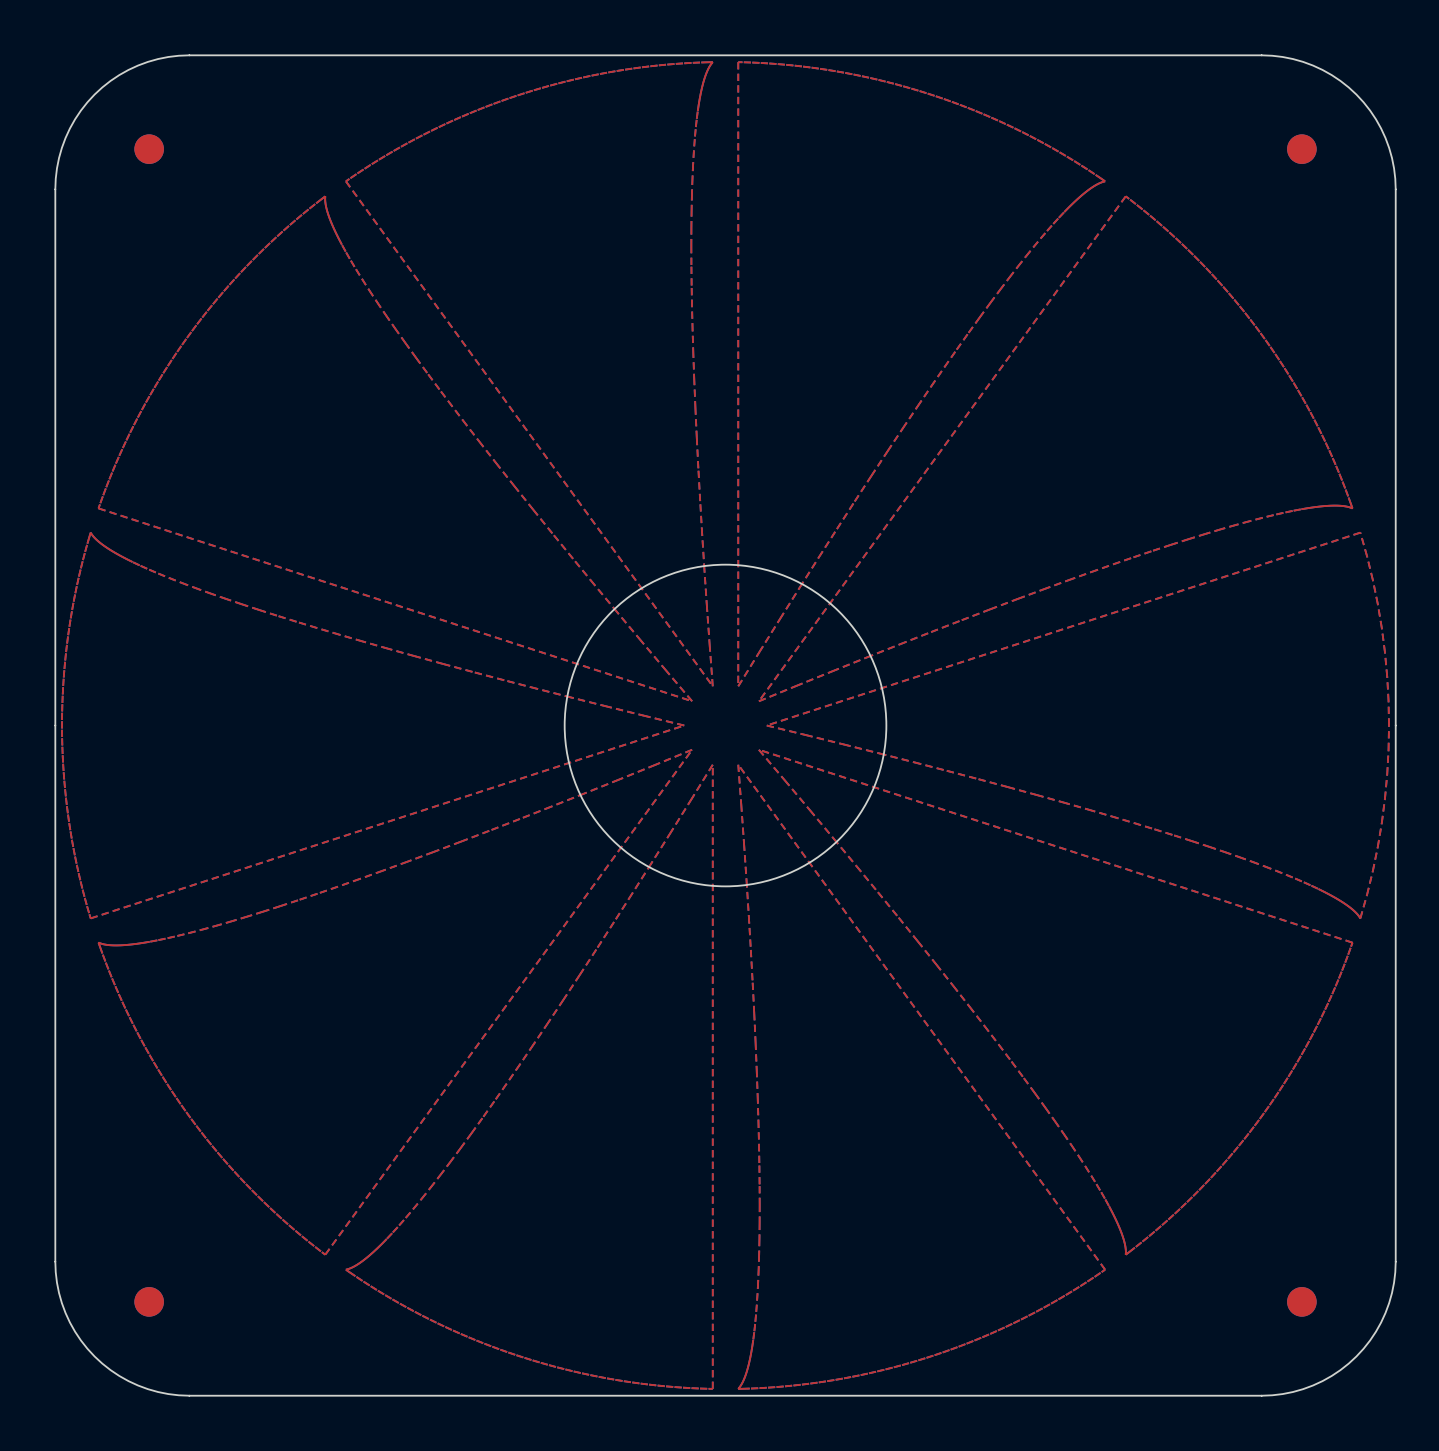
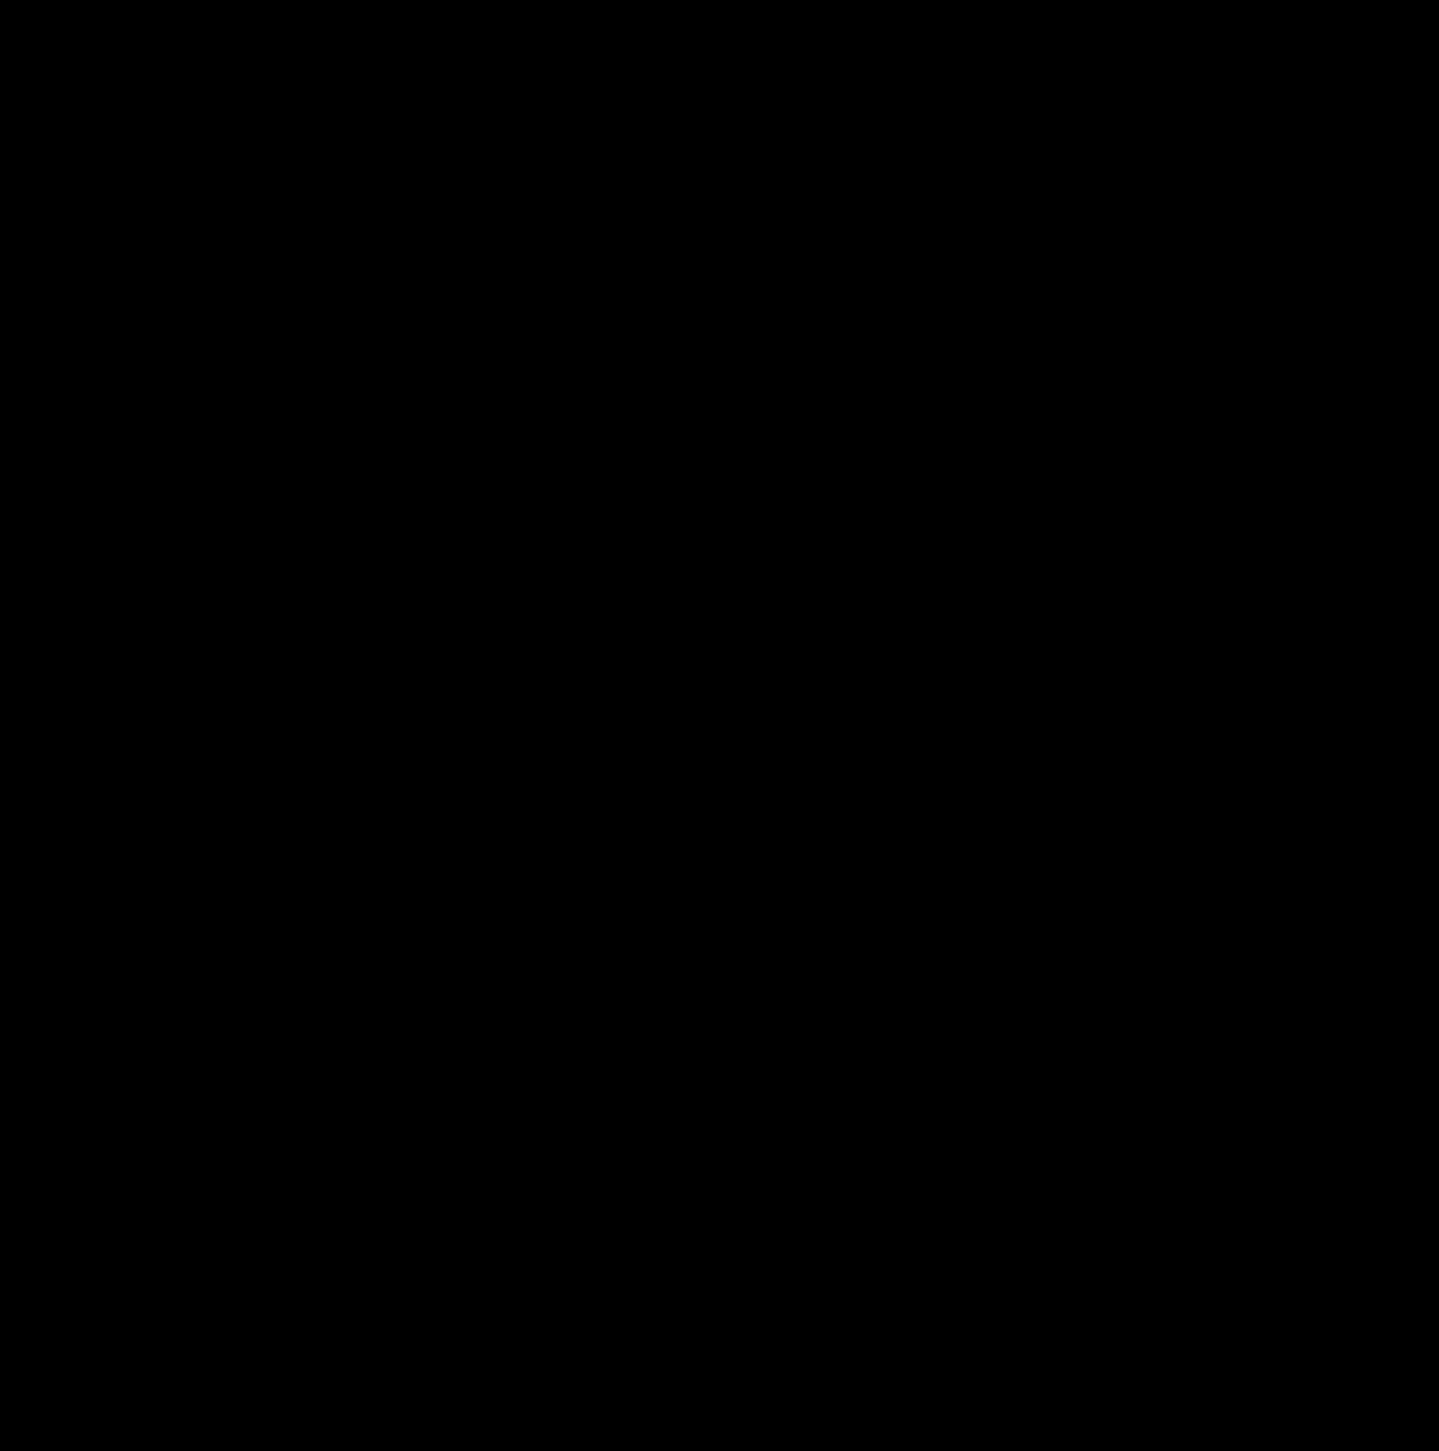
board edge: (189, 55) (1272, 55) (1303, 61) (1322, 69) (1340, 80) (1363, 102) (1381, 128) (1389, 147) (1394, 168) (1395, 189) (1395, 1261) (1392, 1292) (1381, 1322) (1370, 1340) (1348, 1363) (1322, 1381) (1303, 1389) (1282, 1394) (1261, 1395) (189, 1395) (158, 1392) (128, 1381) (110, 1370) (87, 1348) (69, 1322) (61, 1303) (56, 1282) (55, 1261) (55, 178) (61, 147) (69, 128) (80, 110) (94, 94) (110, 80) (138, 65) (158, 59) (189, 55) -> none
top zone outline: (712, 62) (666, 64) (615, 71) (573, 79) (524, 93) (476, 110) (429, 131) (385, 155) (345, 181) (712, 686) (696, 437) (691, 246) (692, 169) (696, 118) (703, 83) (712, 62) -> none
top zone outline: (738, 62) (784, 64) (835, 71) (877, 79) (926, 93) (974, 110) (1021, 131) (1065, 155) (1105, 181) (1085, 192) (1058, 217) (1025, 256) (979, 317) (871, 475) (738, 686) (738, 62) -> none
part: (149, 149) -> none
part: (1301, 149) -> none
top zone outline: (325, 196) (288, 225) (251, 260) (217, 298) (186, 338) (162, 374) (137, 418) (115, 464) (98, 508) (692, 701) (533, 509) (416, 357) (372, 294) (345, 251) (329, 218) (325, 196) -> none
top zone outline: (1125, 196) (1162, 225) (1199, 260) (1233, 298) (1264, 338) (1288, 374) (1313, 418) (1335, 464) (1352, 508) (1329, 505) (1293, 510) (1244, 522) (1170, 544) (990, 609) (758, 701) (1125, 196) -> none
top zone outline: (90, 532) (78, 577) (69, 628) (63, 678) (62, 721) (63, 772) (69, 823) (78, 873) (90, 918) (684, 725) (443, 663) (259, 609) (186, 584) (139, 565) (107, 548) (90, 532) -> none
top zone outline: (1360, 532) (1372, 579) (1381, 628) (1387, 676) (1389, 725) (1387, 774) (1381, 823) (1372, 871) (1360, 918) (1343, 902) (1311, 885) (1264, 866) (1191, 841) (1007, 787) (766, 725) (1360, 532) -> none
round board edge: [564, 564, 887, 887] -> none
top zone outline: (692, 749) (325, 1254) (288, 1225) (251, 1190) (217, 1152) (186, 1112) (162, 1076) (137, 1032) (115, 986) (98, 942) (121, 945) (157, 940) (206, 928) (280, 906) (460, 841) (692, 749) -> none
top zone outline: (758, 749) (1352, 942) (1335, 986) (1313, 1032) (1288, 1076) (1264, 1112) (1233, 1152) (1199, 1190) (1162, 1225) (1125, 1254) (1121, 1232) (1105, 1199) (1078, 1156) (1034, 1093) (917, 941) (758, 749) -> none
top zone outline: (712, 764) (712, 1388) (666, 1386) (615, 1379) (573, 1371) (524, 1357) (476, 1340) (429, 1319) (385, 1295) (345, 1269) (365, 1258) (392, 1233) (425, 1194) (471, 1133) (579, 975) (712, 764) -> none
top zone outline: (738, 764) (1105, 1269) (1065, 1295) (1021, 1319) (974, 1340) (926, 1357) (877, 1371) (835, 1379) (784, 1386) (738, 1388) (747, 1368) (754, 1332) (758, 1281) (759, 1204) (754, 1013) (738, 764) -> none
part: (149, 1301) -> none
part: (1301, 1301) -> none

